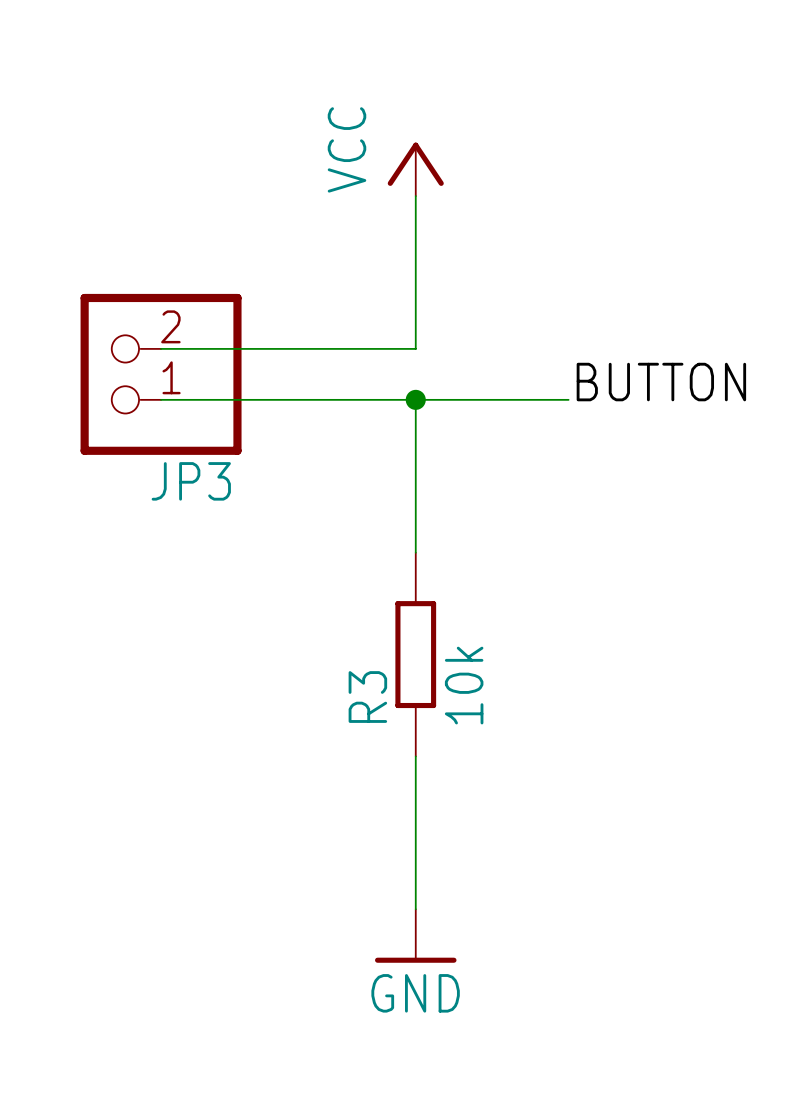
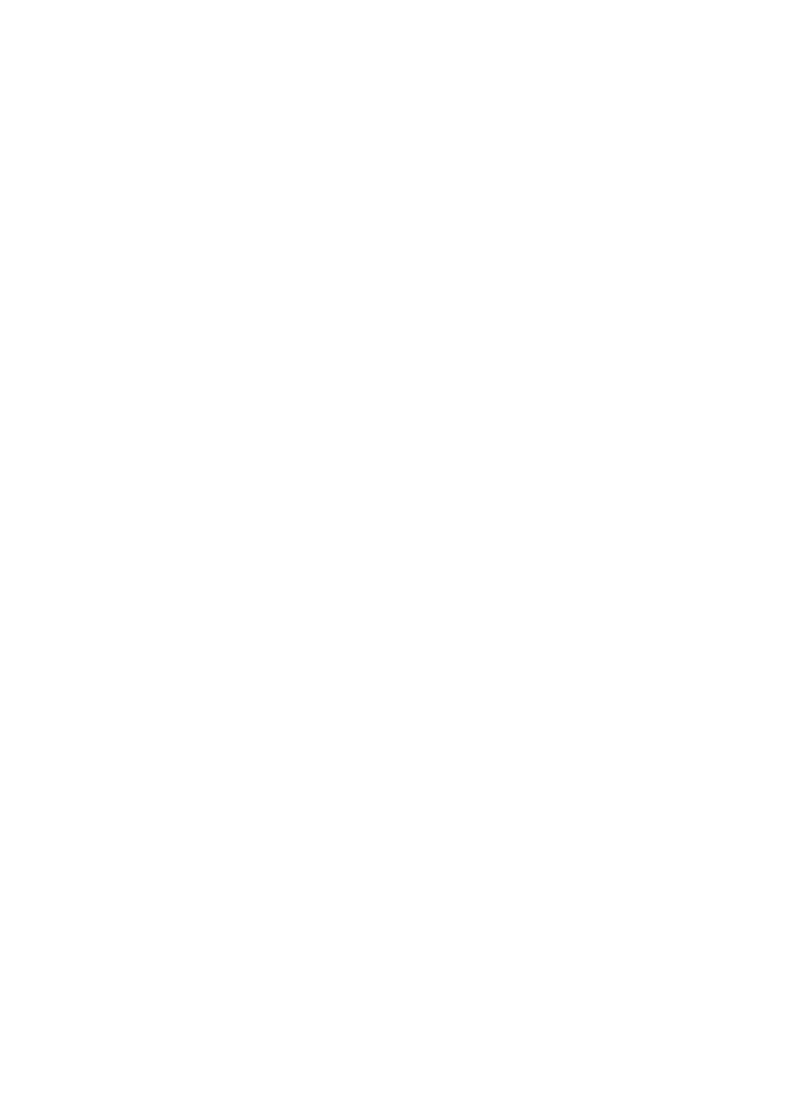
power symbol: VCC (415, 169) -> none
wire: (415, 196) (415, 348) (161, 348) -> none
JP3: (161, 374) -> none
label: BUTTON (661, 382) -> none
wire: (161, 399) (568, 399) -> none
wire: (415, 399) (415, 552) -> none
junction: (415, 399) -> none
R3: 10k (415, 654) -> none
wire: (415, 756) (415, 909) -> none
power symbol: GND (415, 936) -> none

